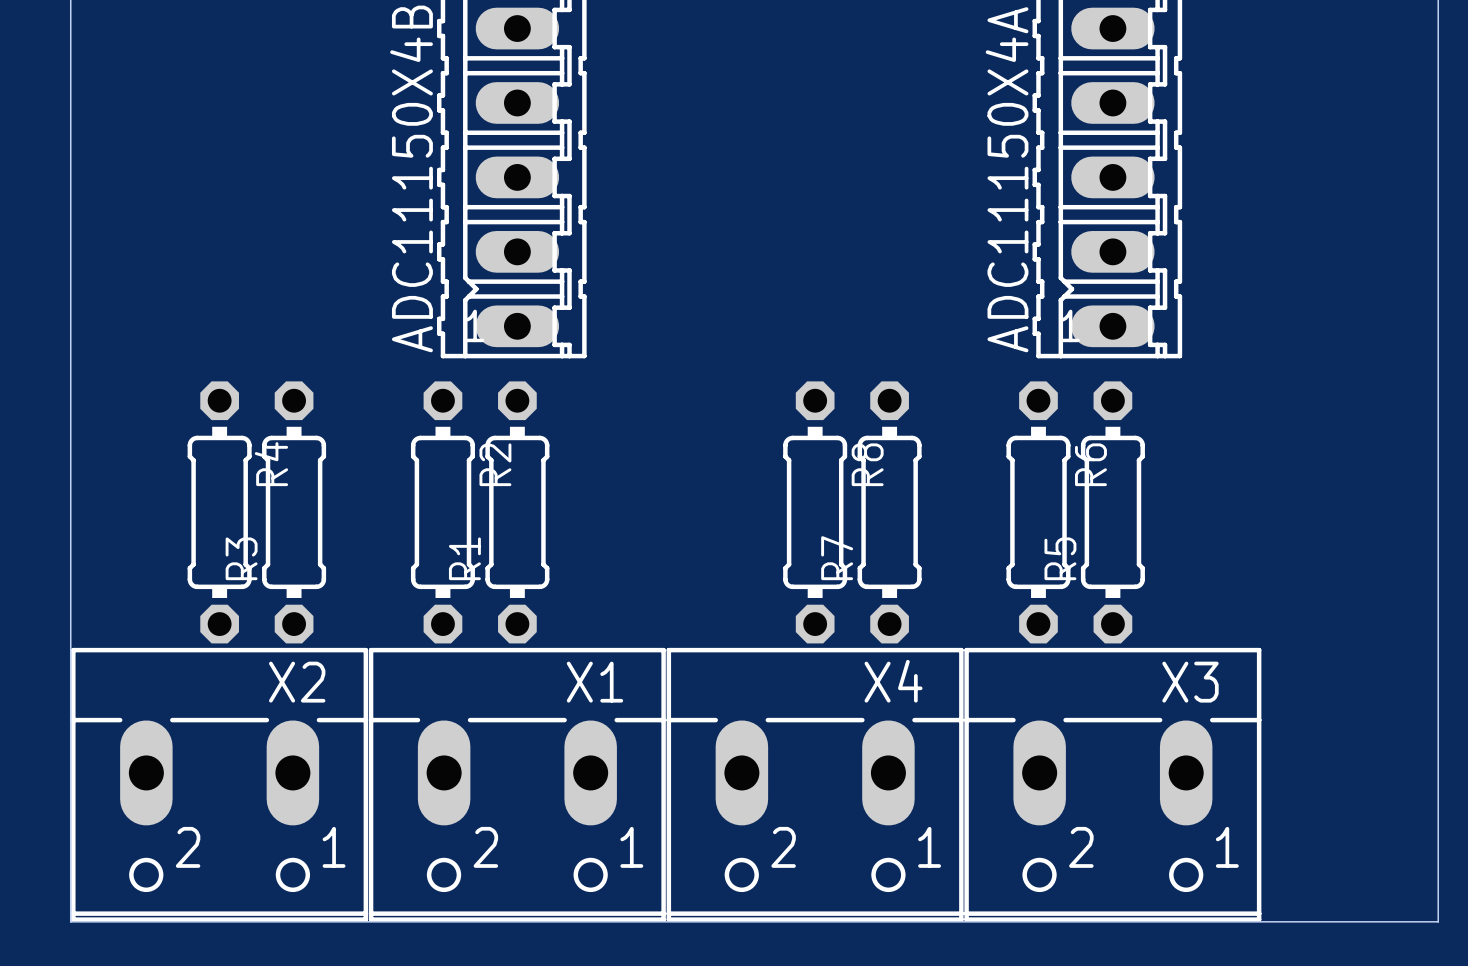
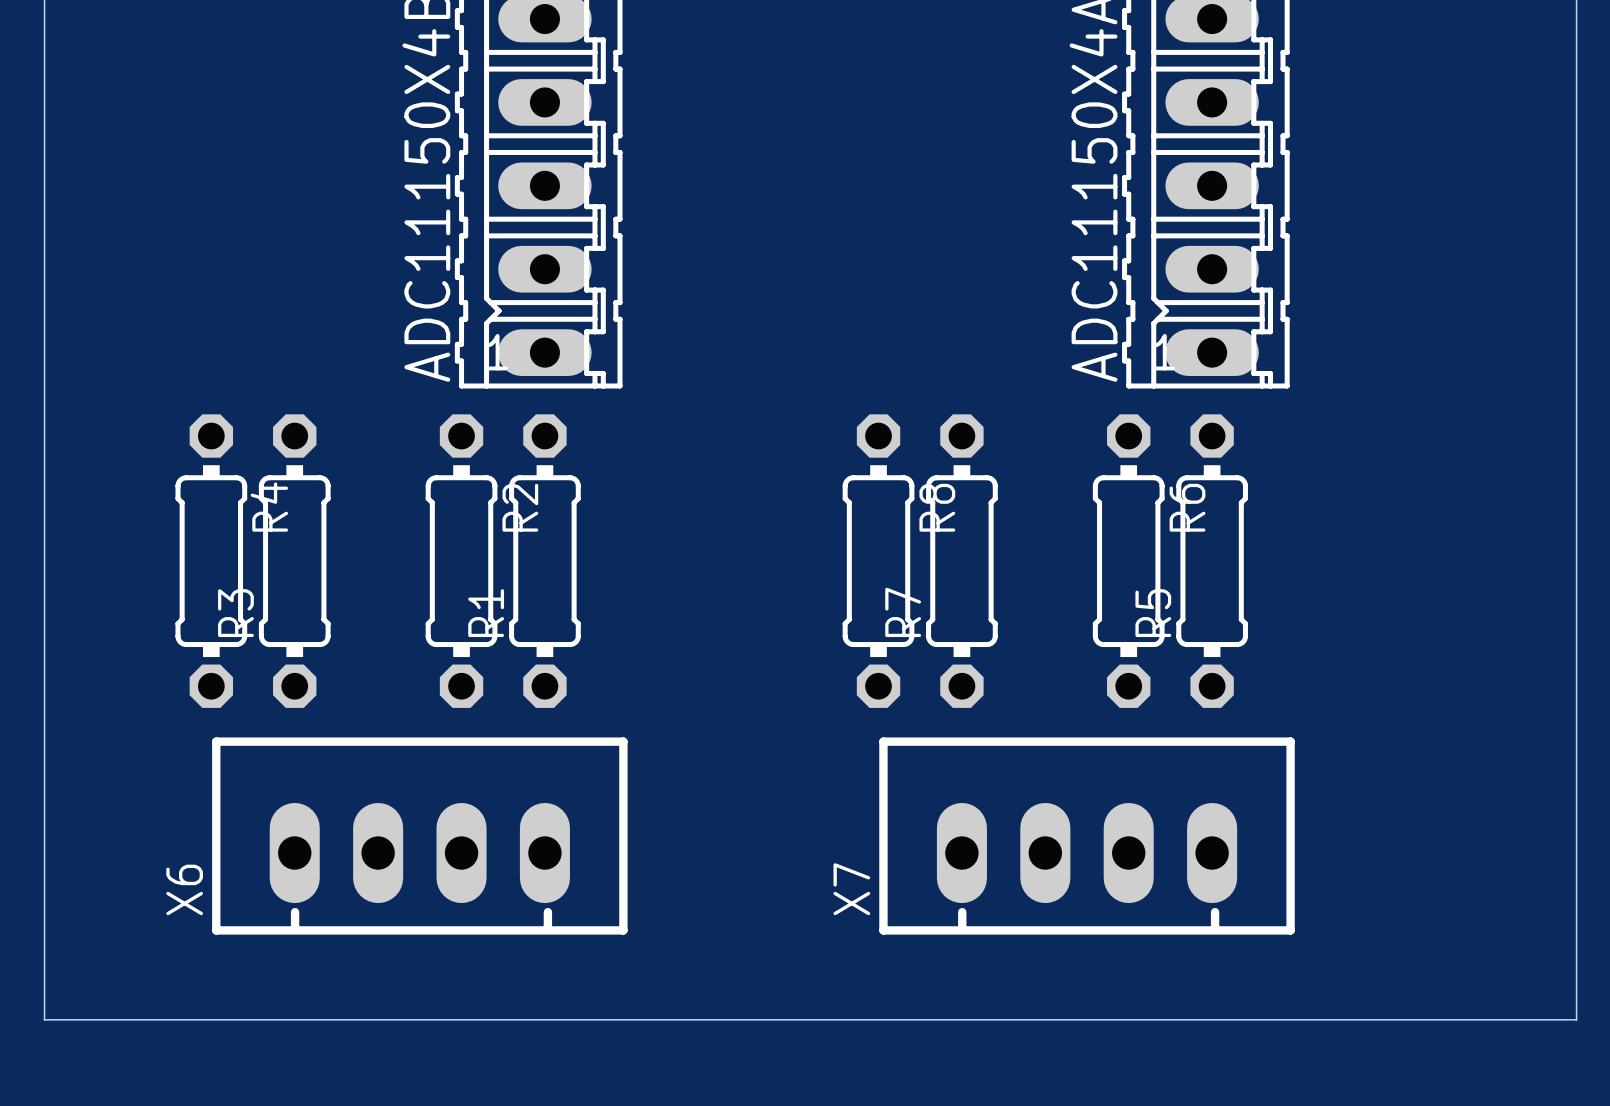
X6: none -> (419, 836)
X7: none -> (1087, 836)
X2: (219, 784) -> none
X1: (517, 784) -> none
X4: (815, 784) -> none
X3: (1112, 784) -> none

